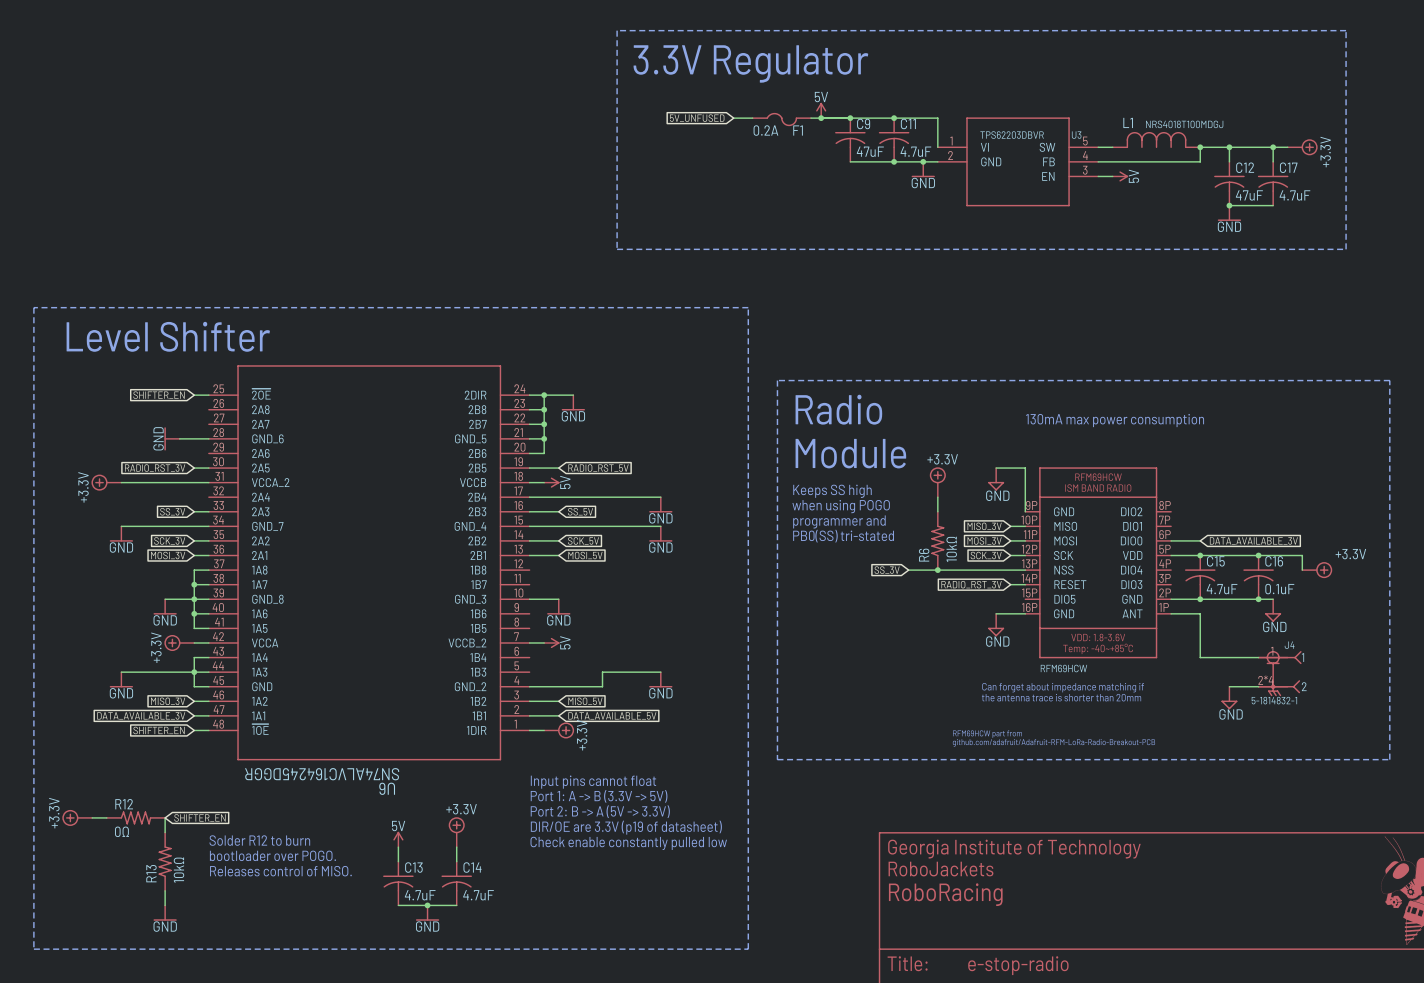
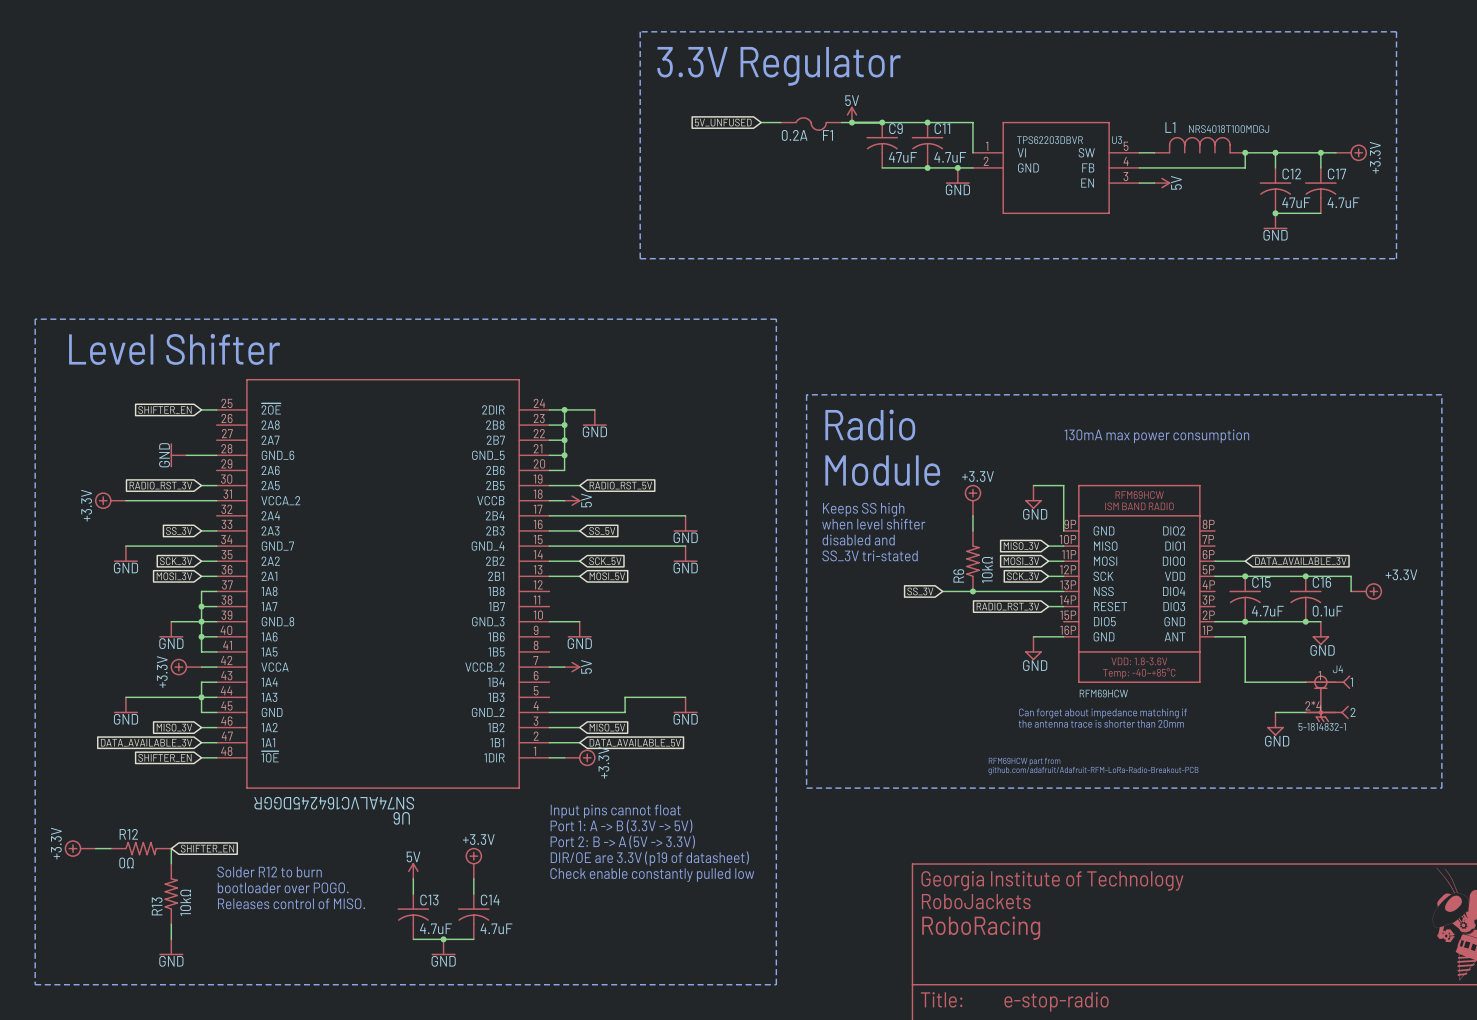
text: when using POGO (841, 506) -> when level shifter (873, 524)
text: programmer and (839, 521) -> disabled and (858, 540)
text: PB0(SS) tri-stated (843, 536) -> SS_3V tri-stated (870, 555)

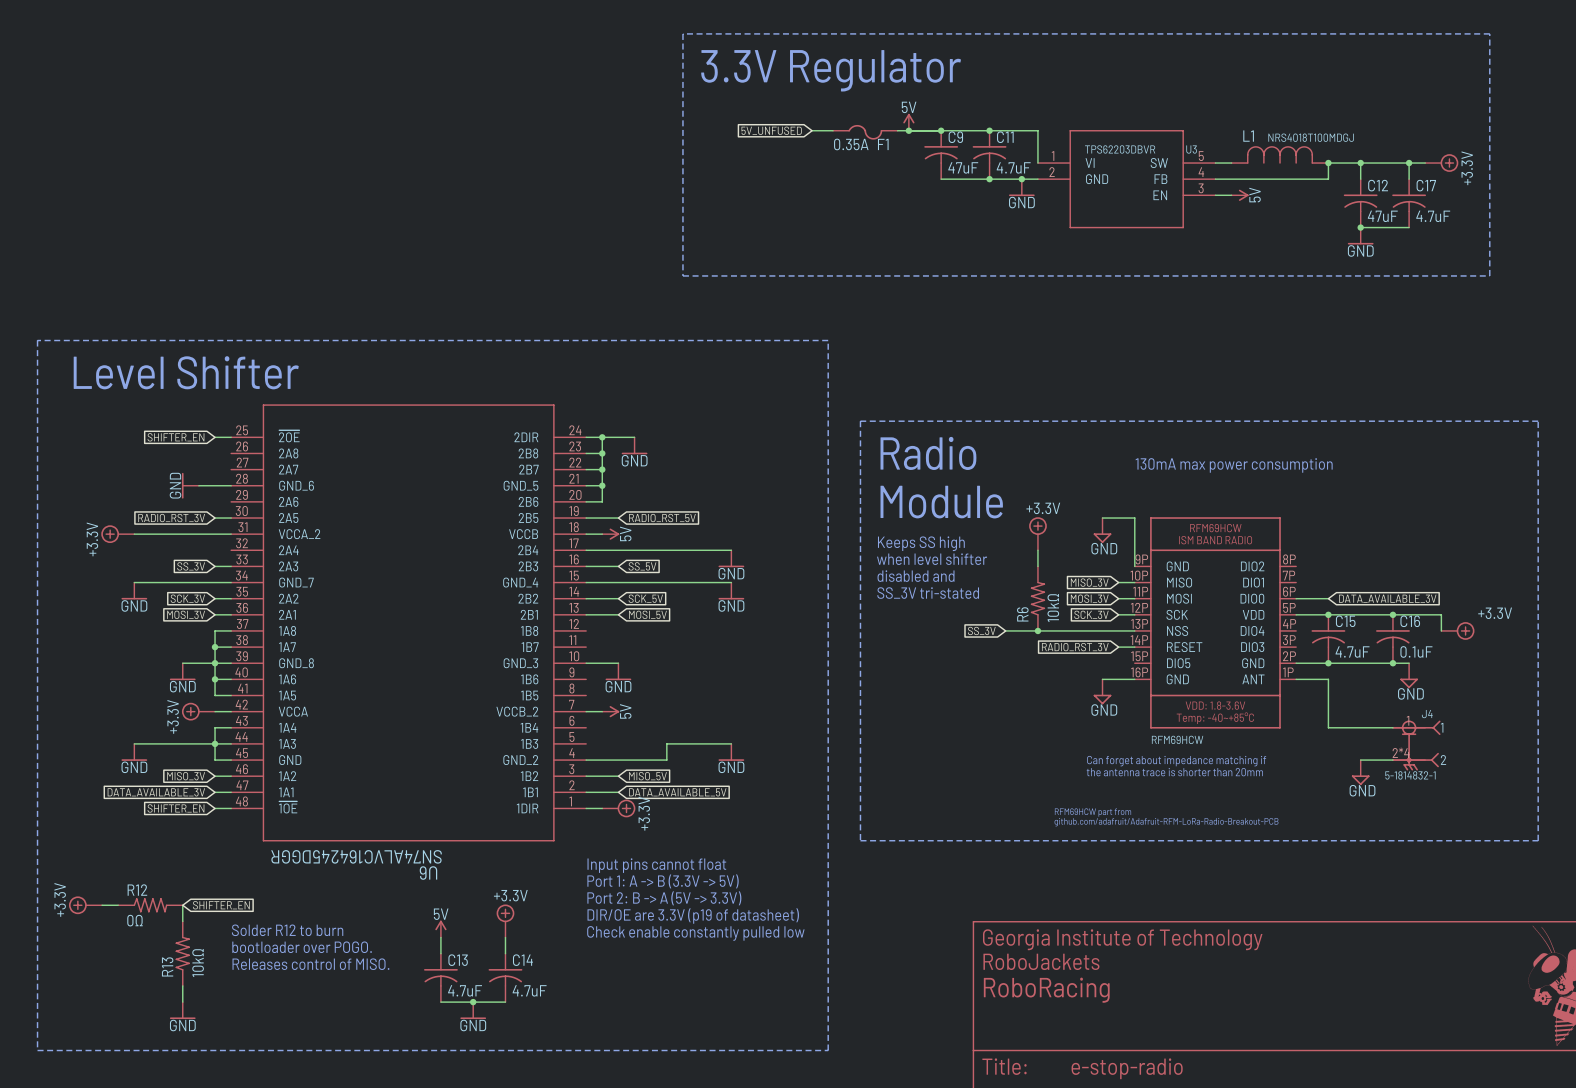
F1 value: 0.2A (794, 135) -> 0.35A (851, 144)

